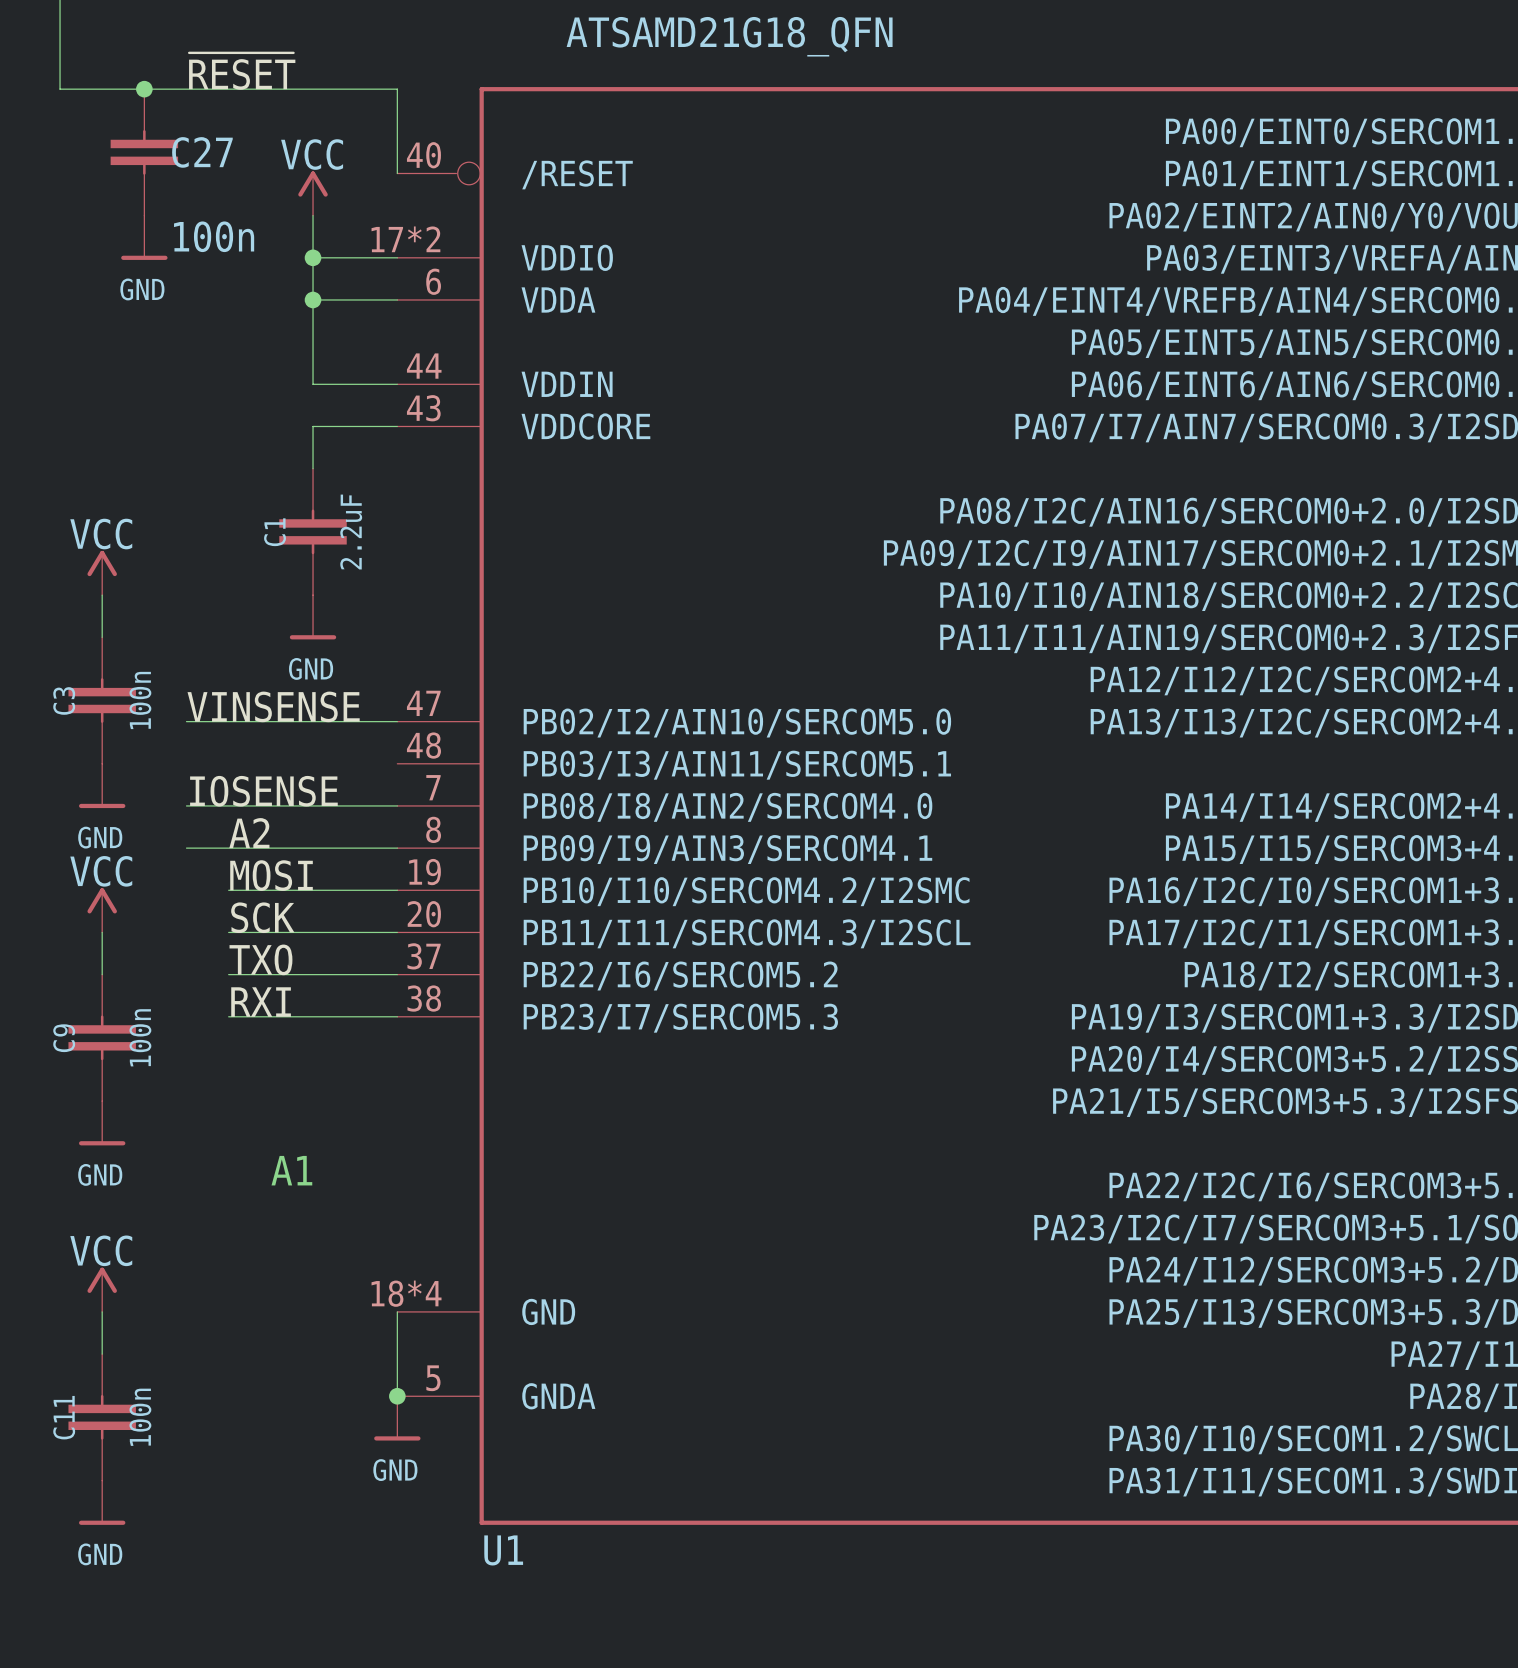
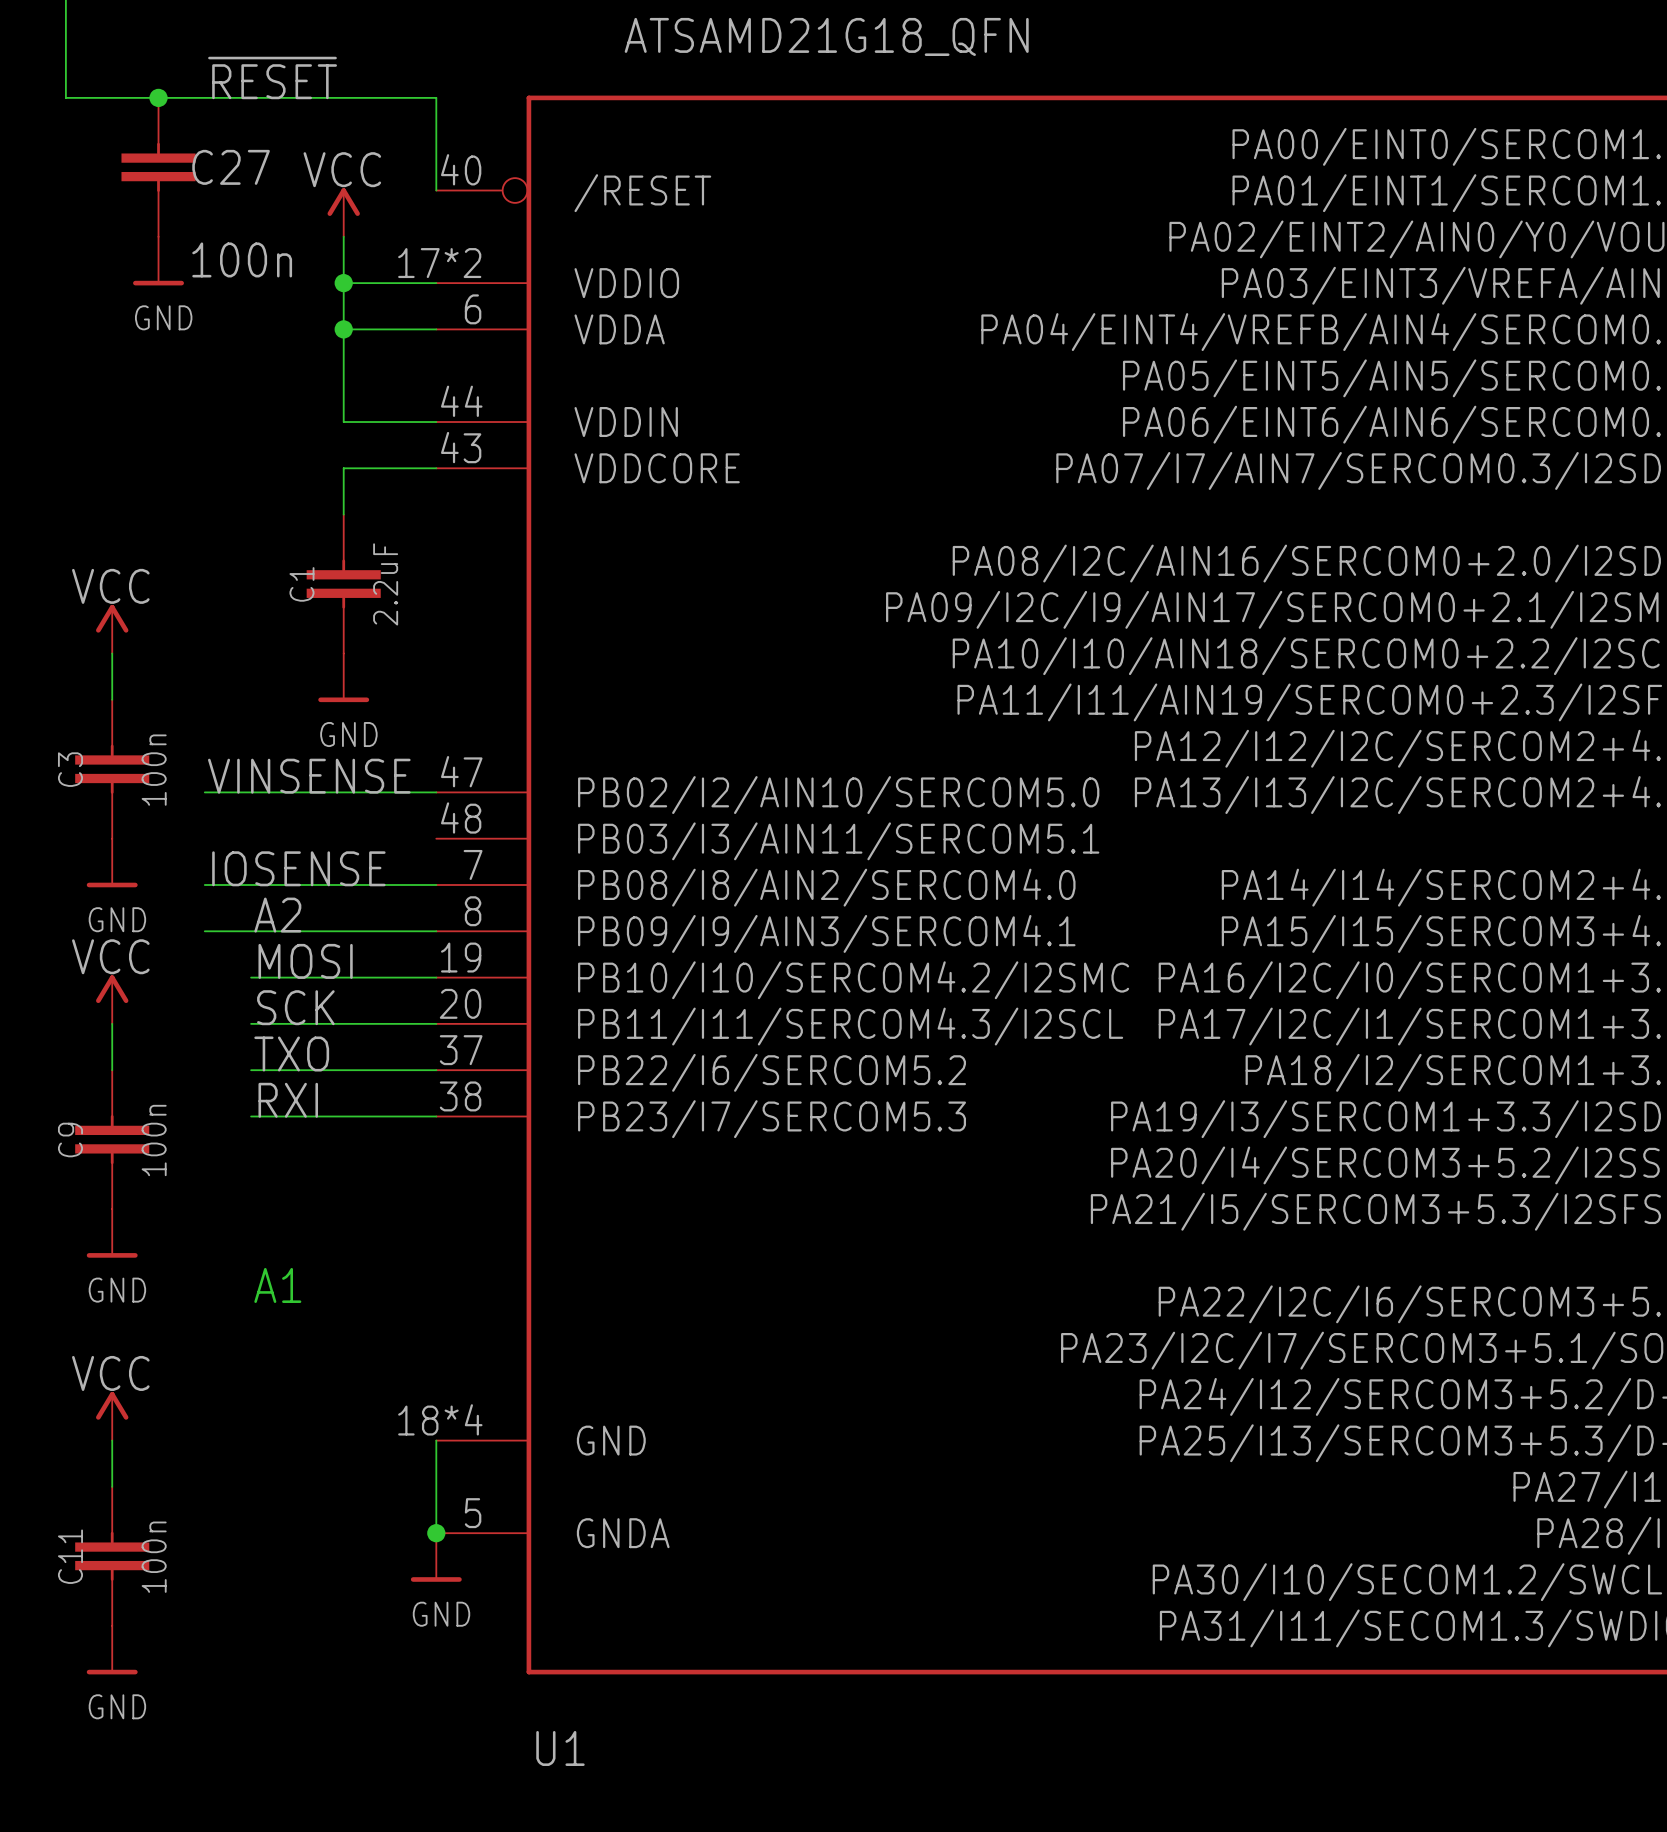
text position: A1 (291, 1170) -> A1 (277, 1285)
U1 name position: U1 (503, 1550) -> U1 (560, 1748)

